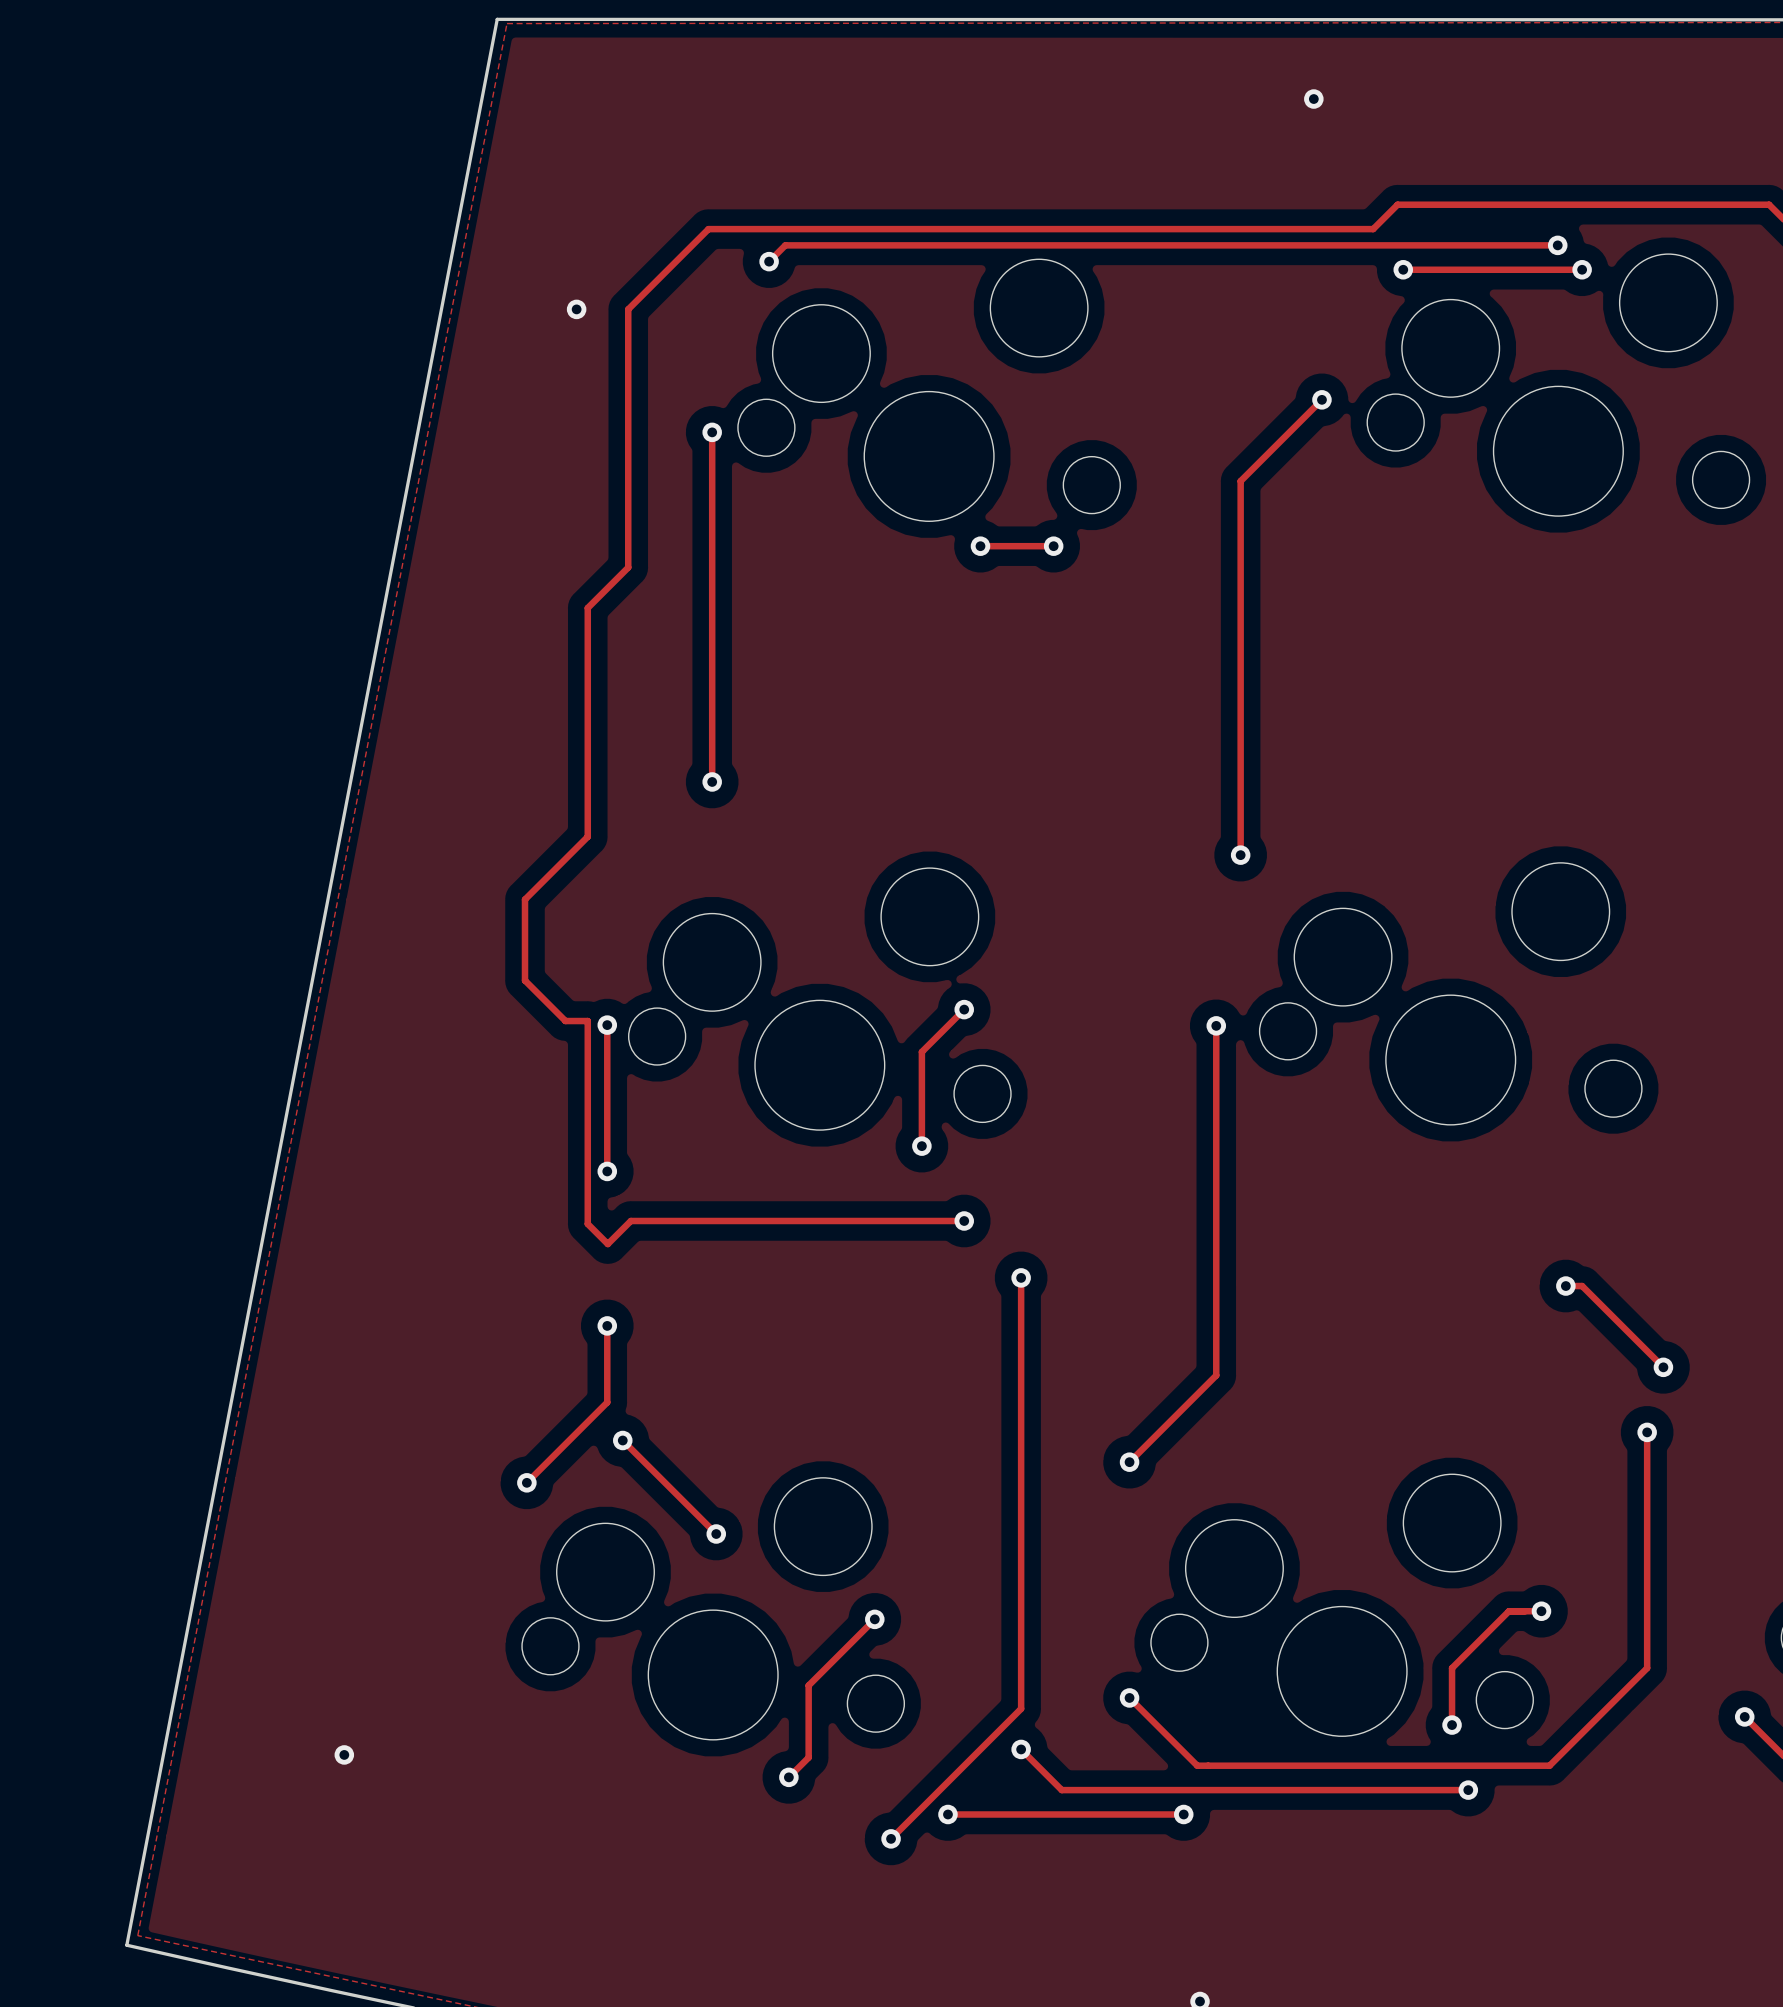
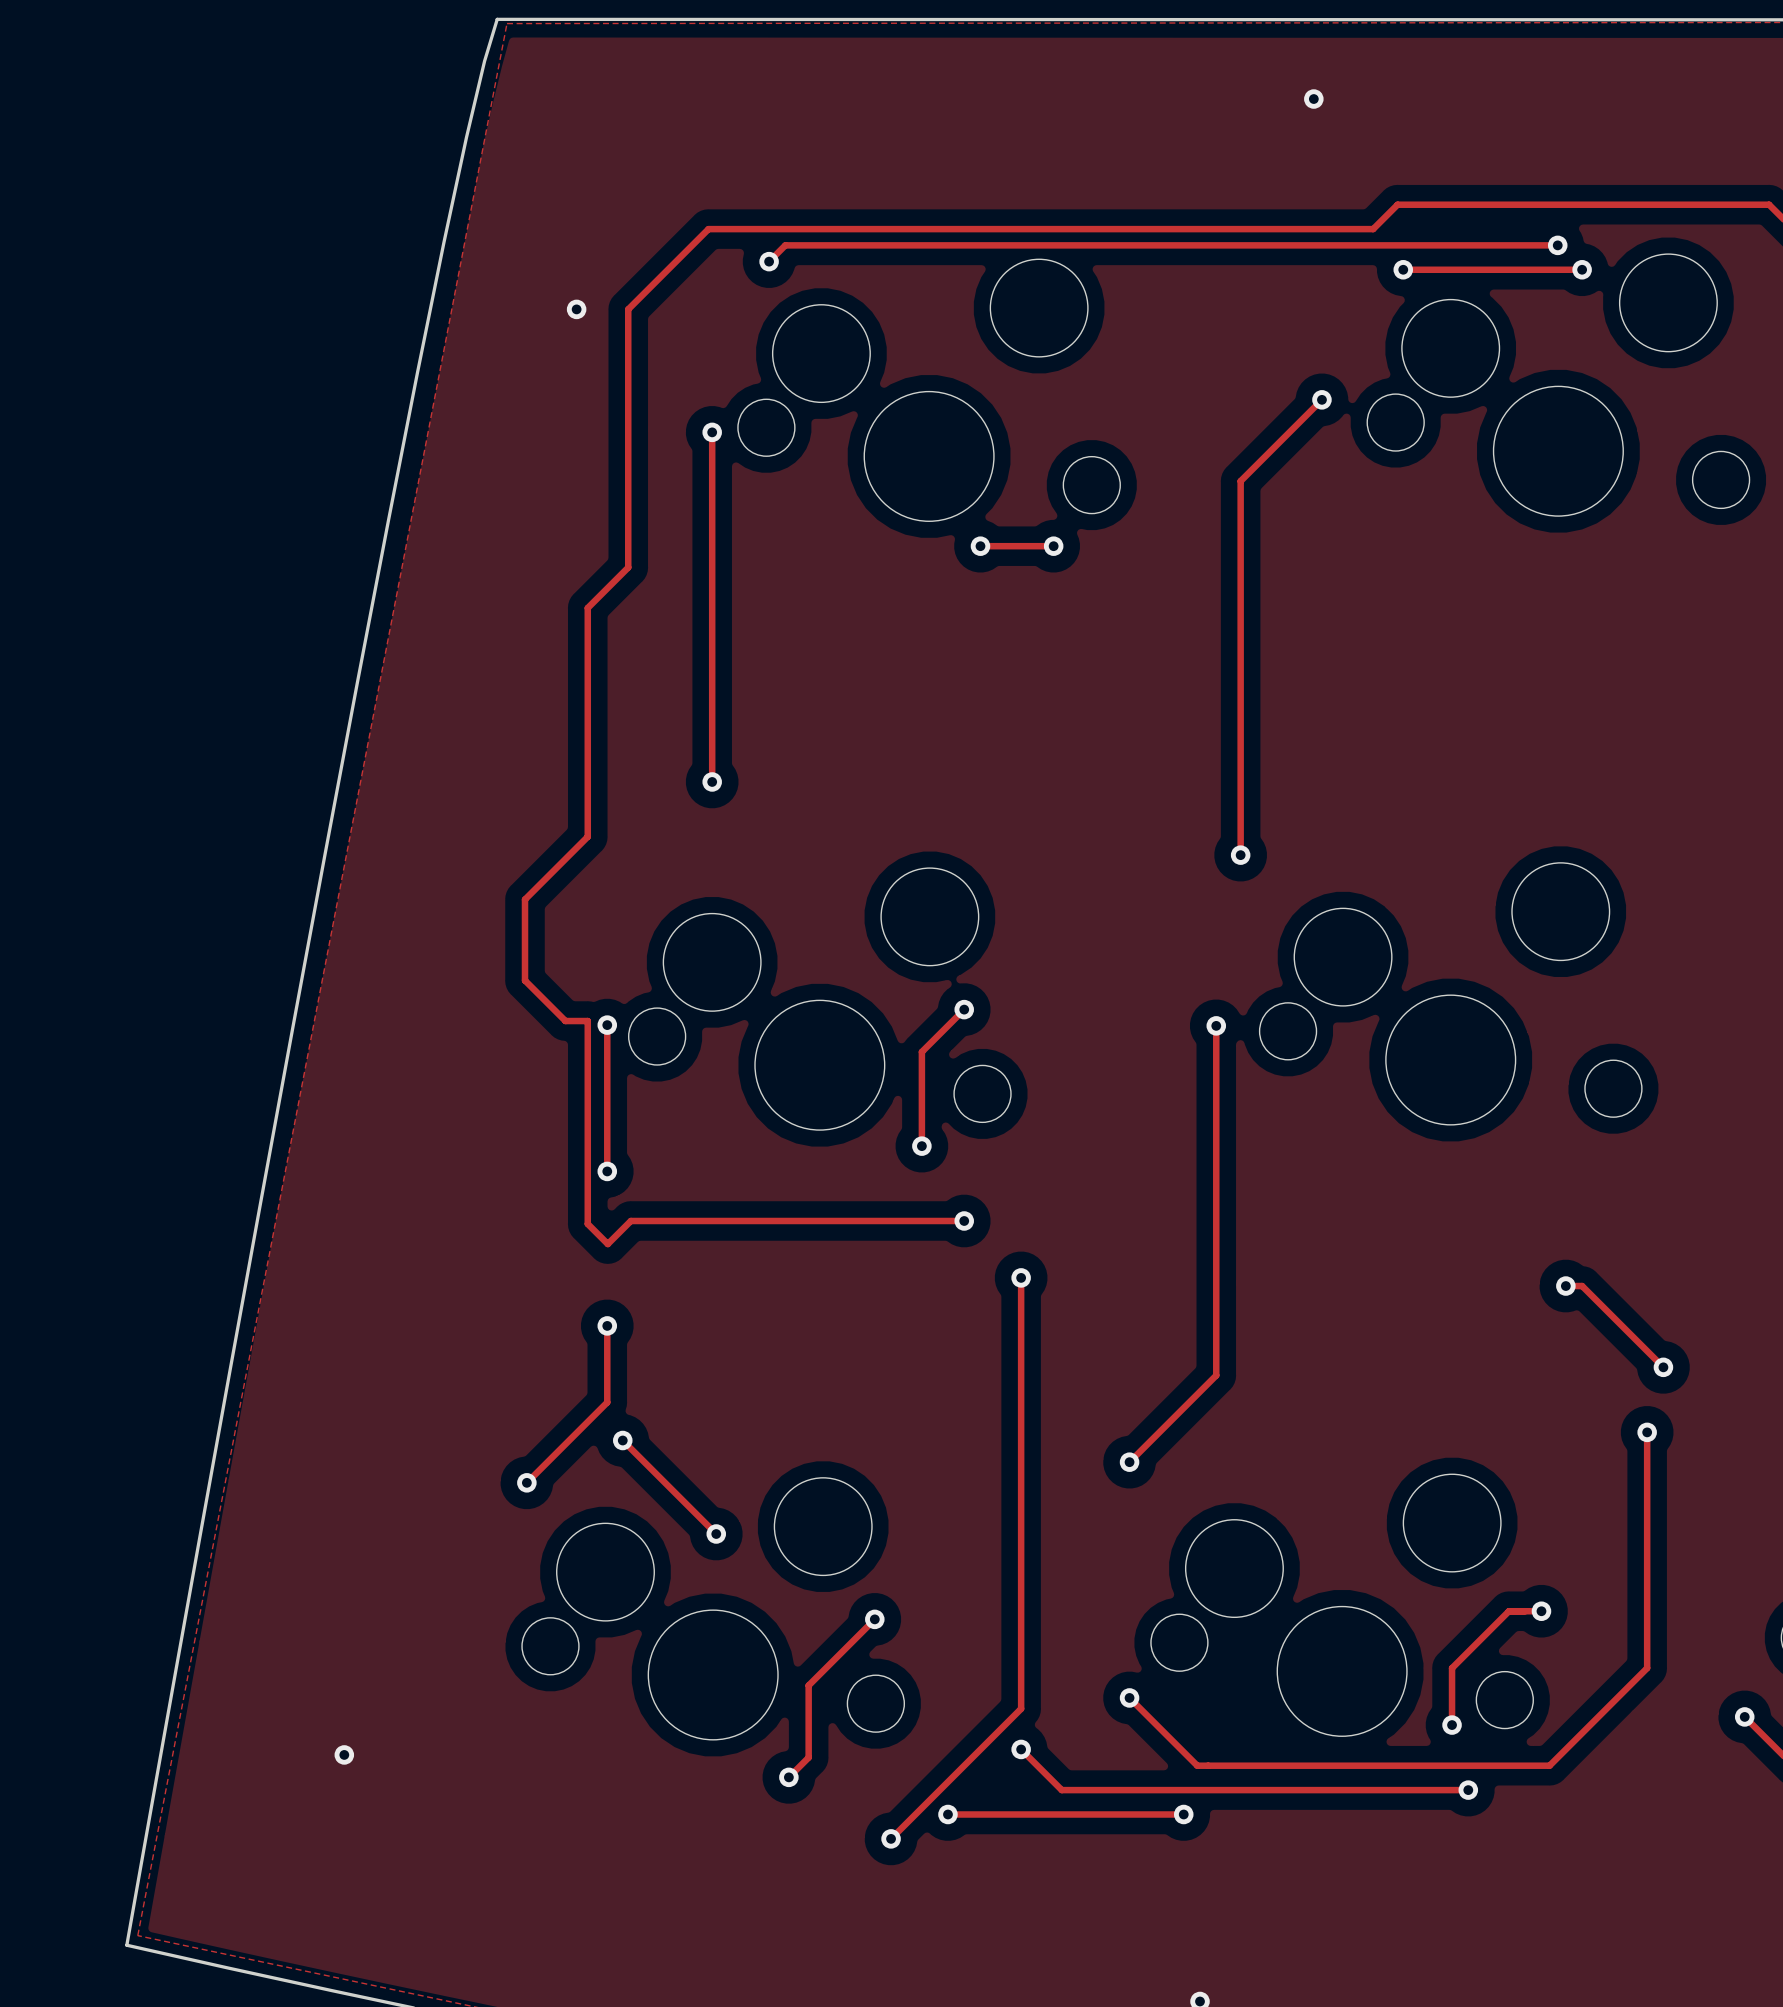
board edge: (497, 19) (126, 1945) -> (497, 19) (484, 61) (466, 137) (388, 520) (260, 1201) (126, 1945)

